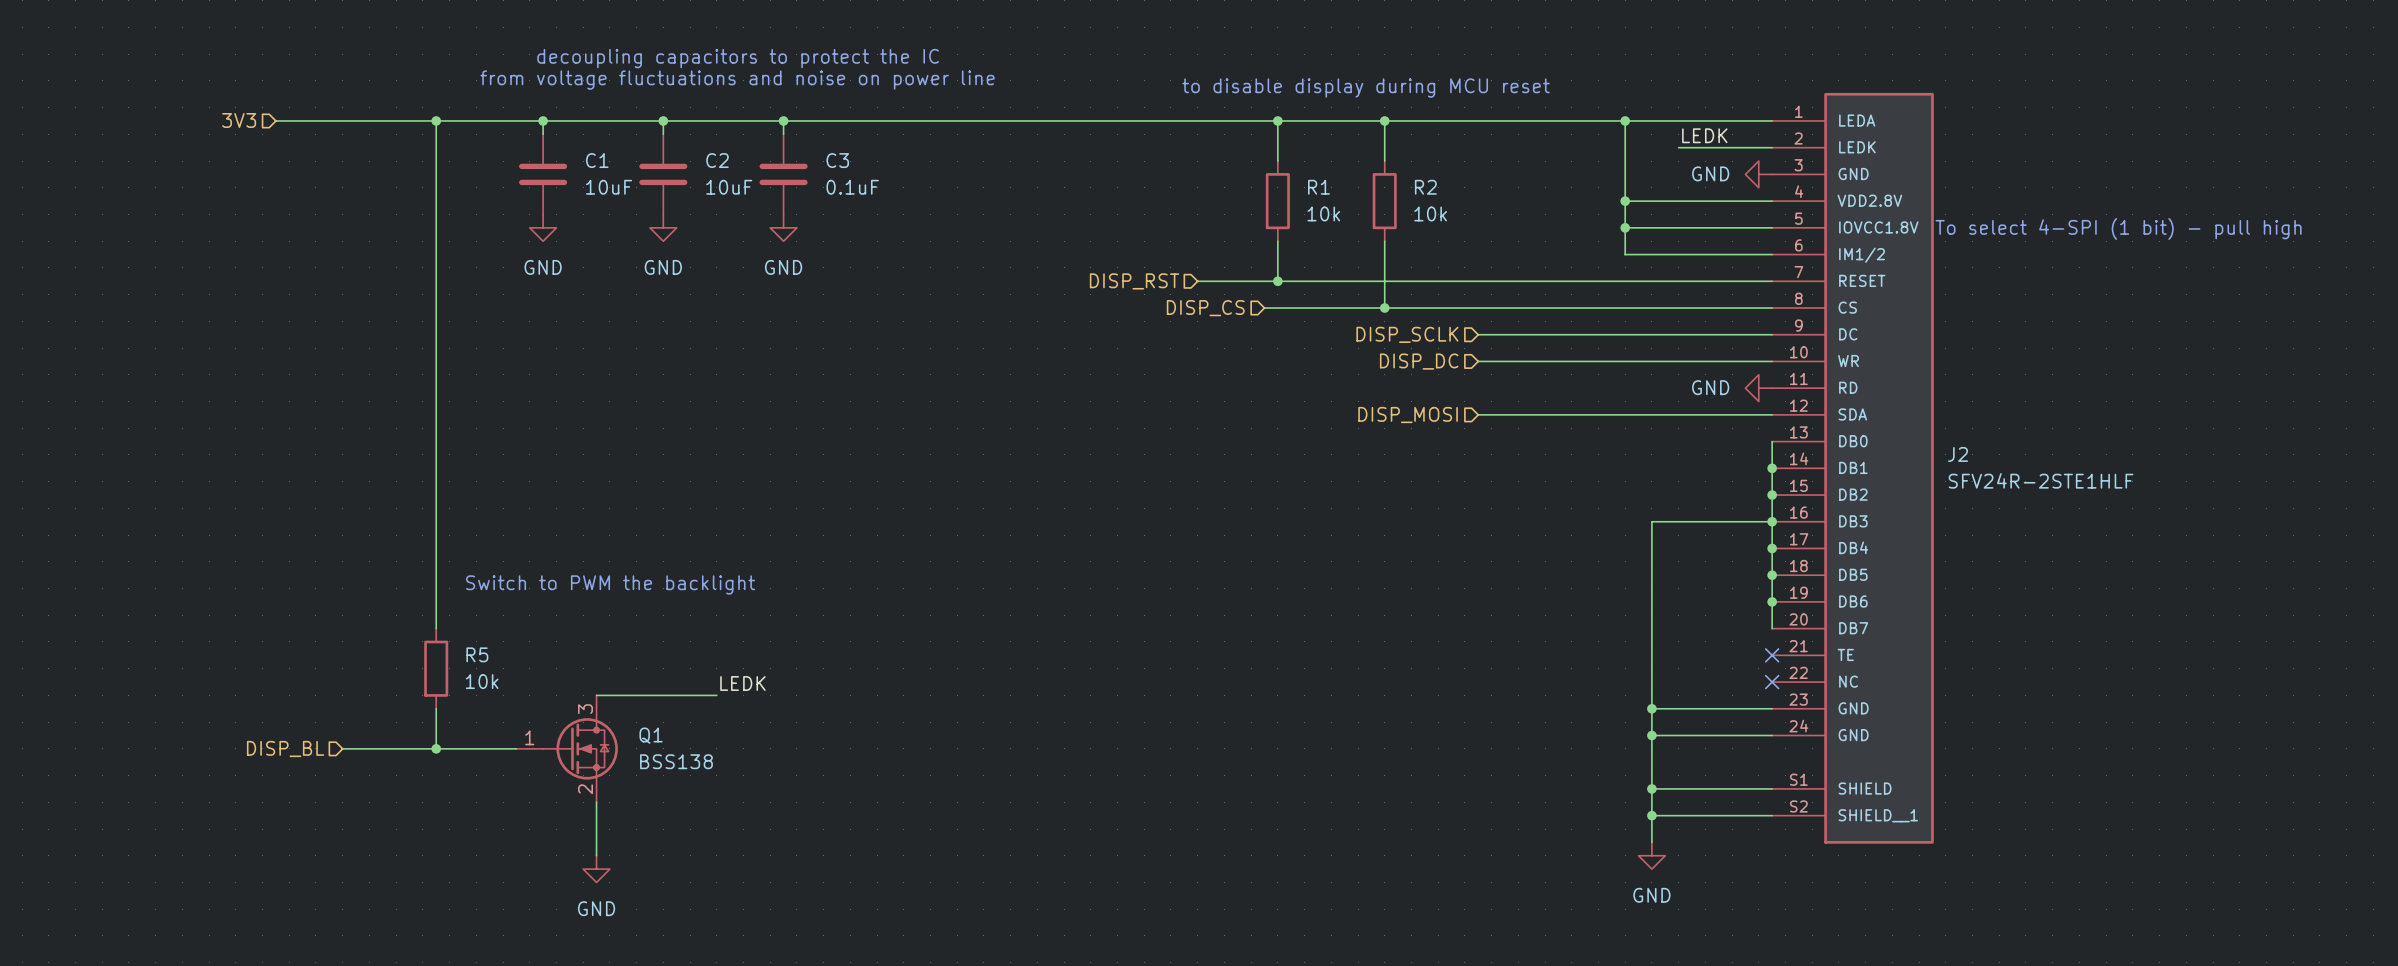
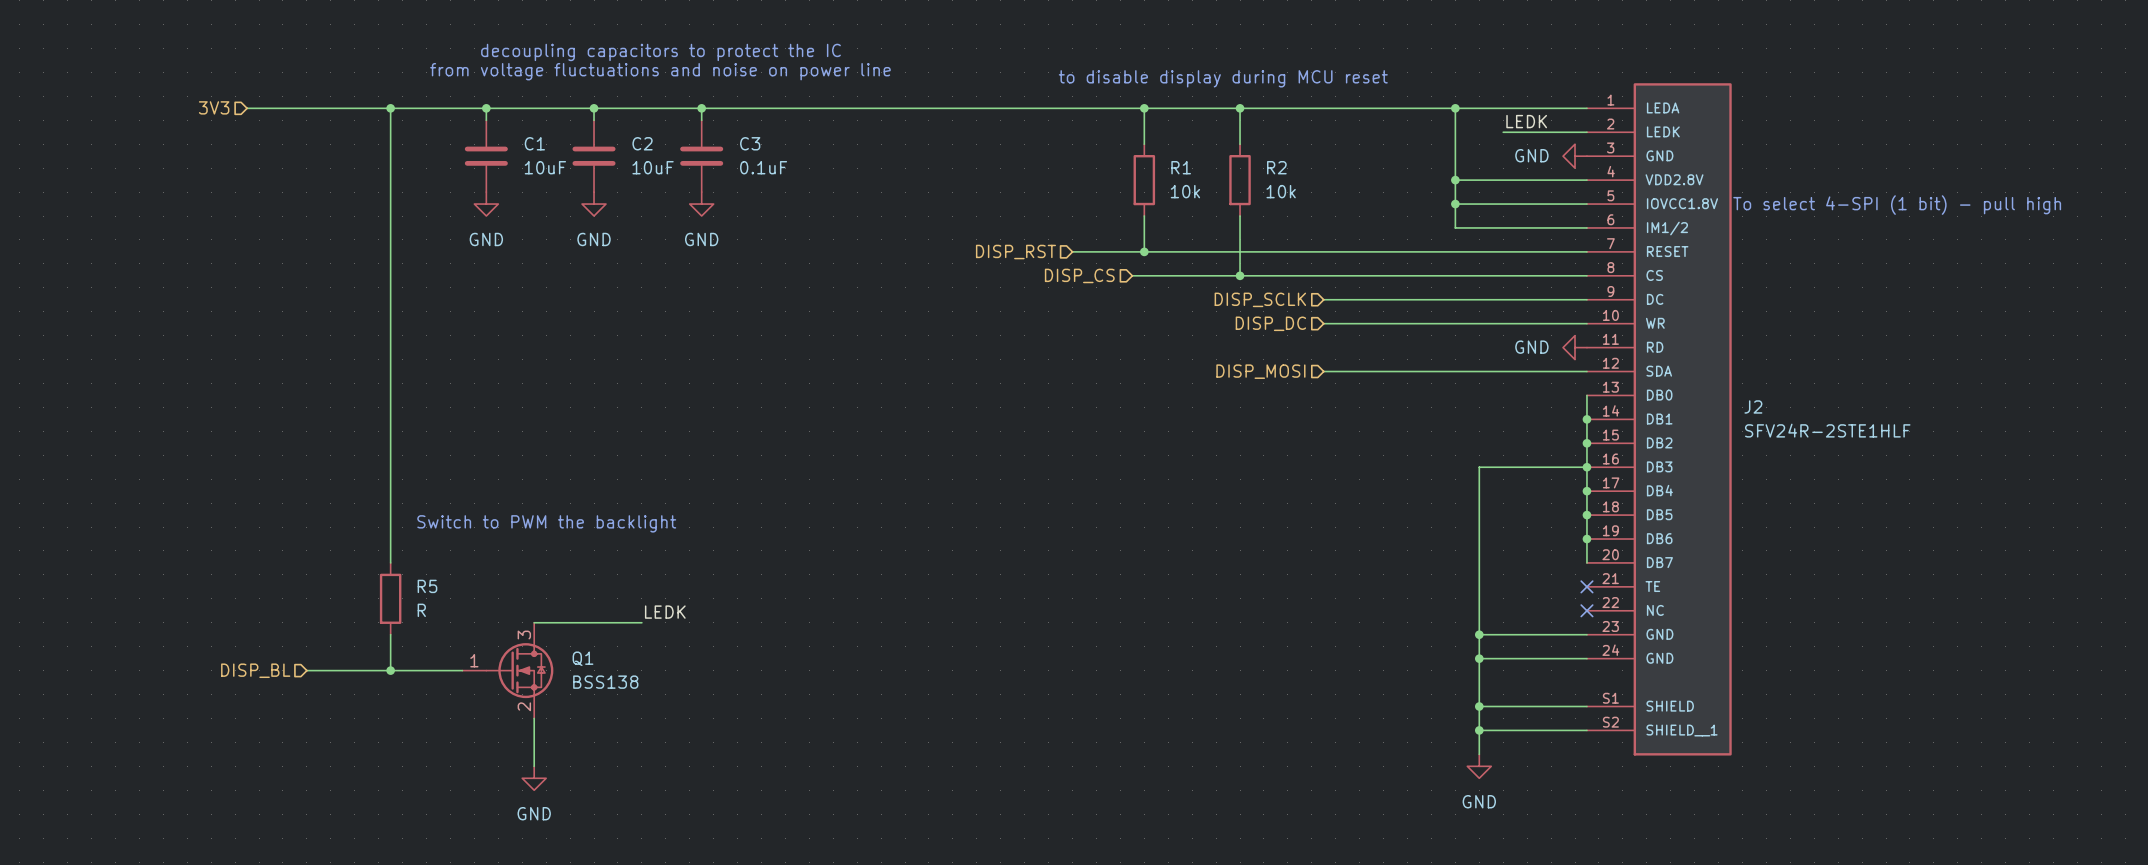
R5 value: 10k (482, 681) -> R (421, 610)

